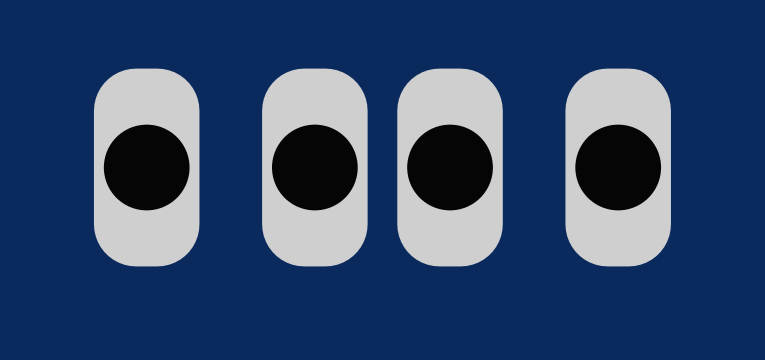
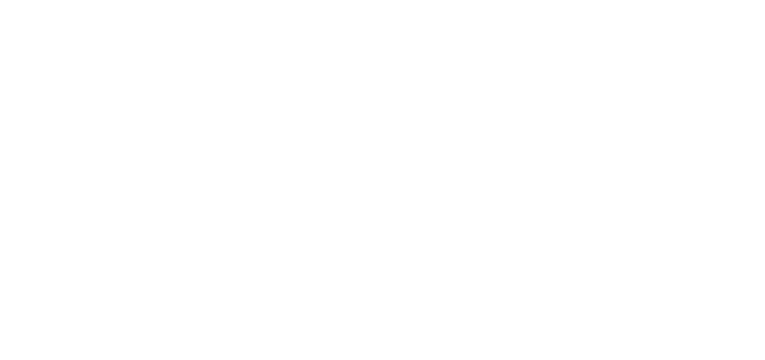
part: (382, 167) -> none

